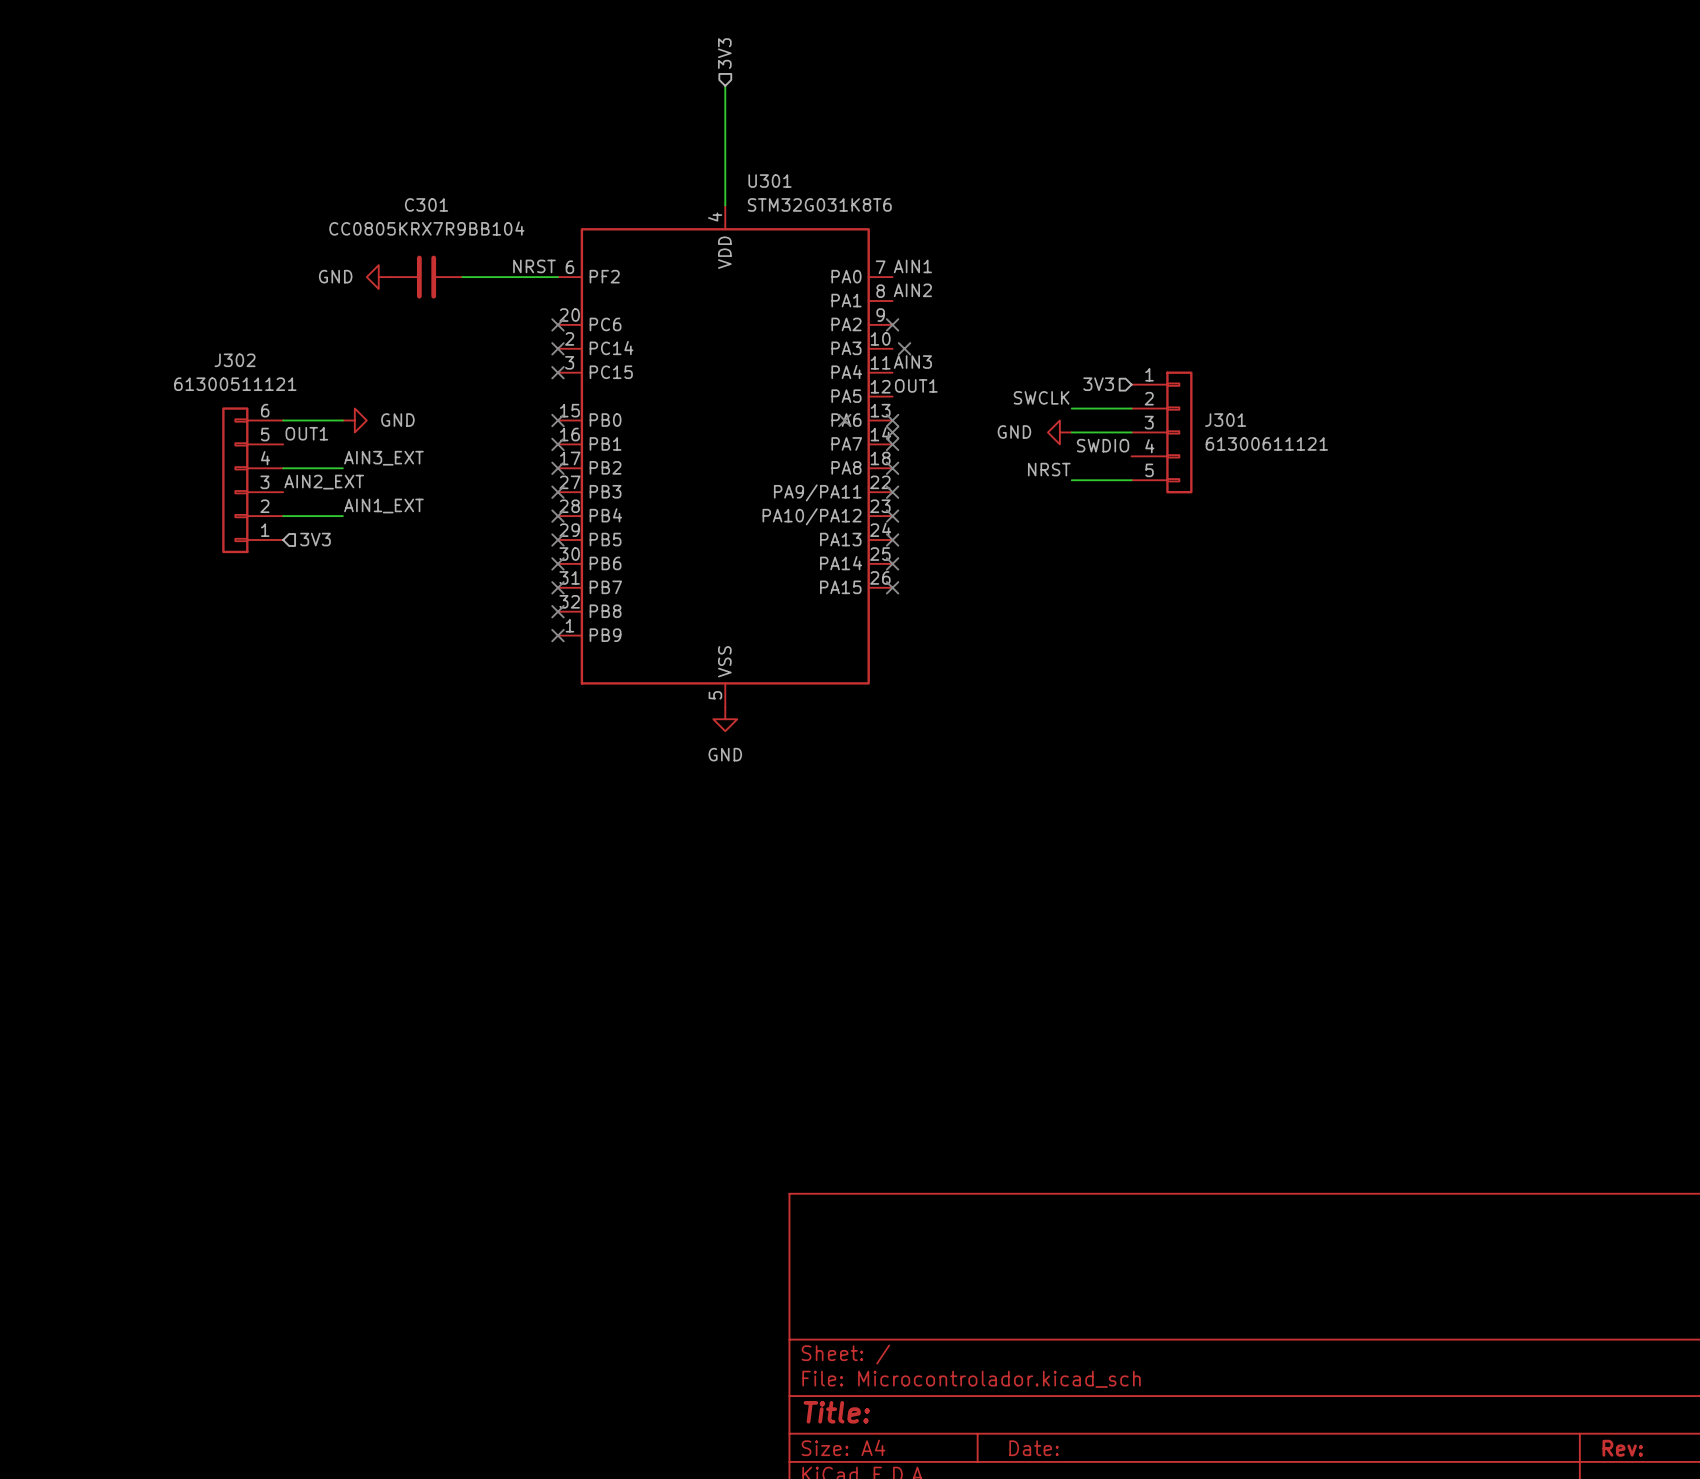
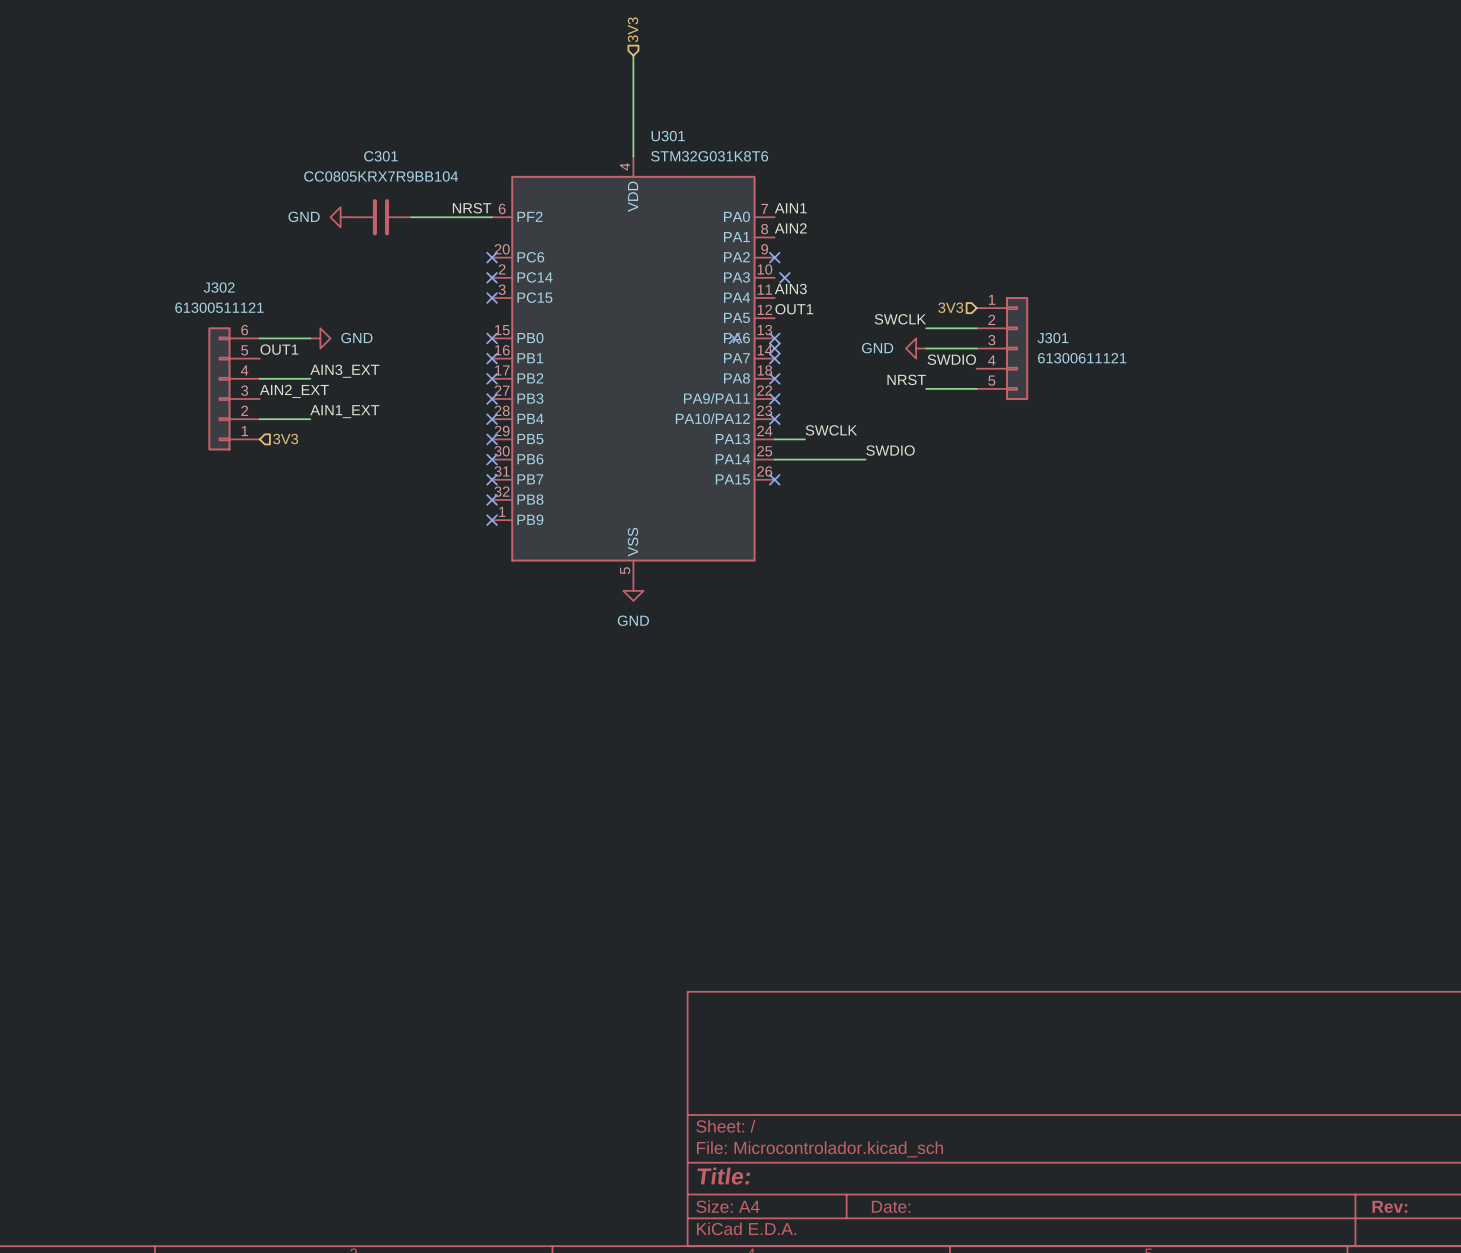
label: none -> SWCLK (831, 430)
wire: none -> (774, 439) (805, 439)
no-connect mark: (892, 540) -> none
label: none -> SWDIO (890, 450)
wire: none -> (774, 459) (865, 459)
no-connect mark: (892, 563) -> none

